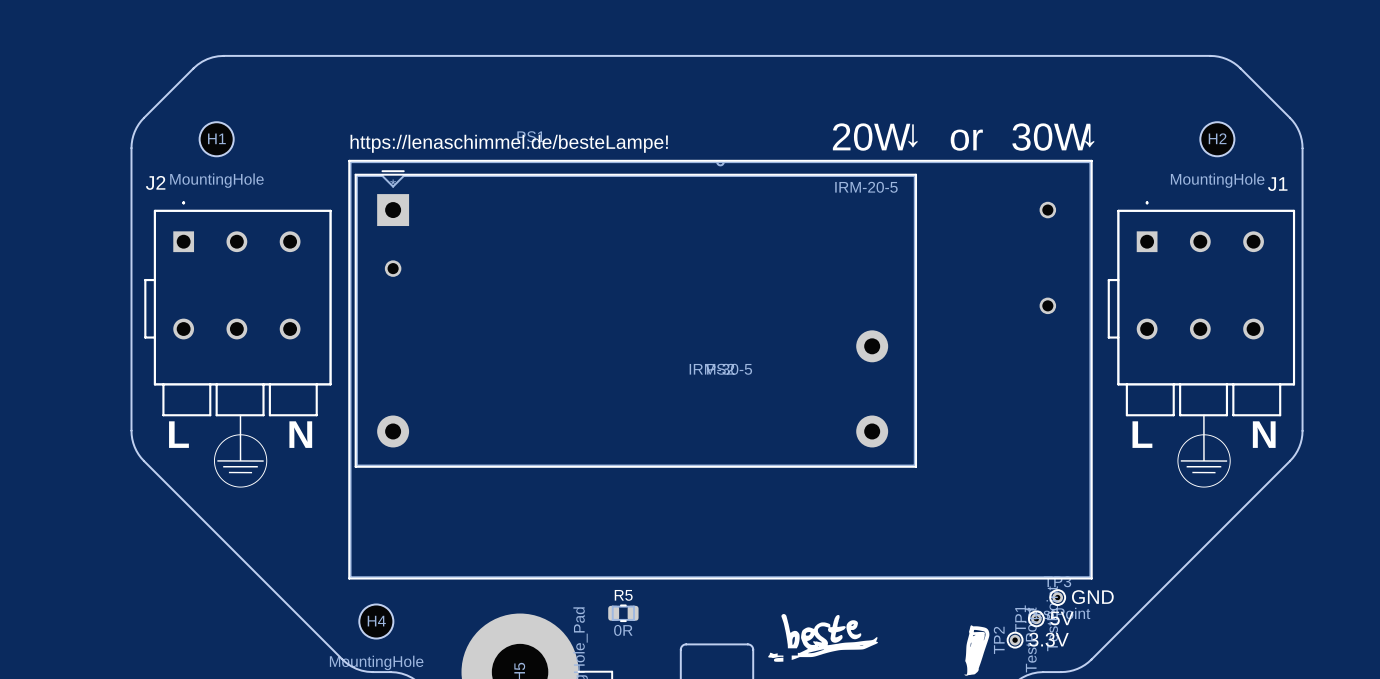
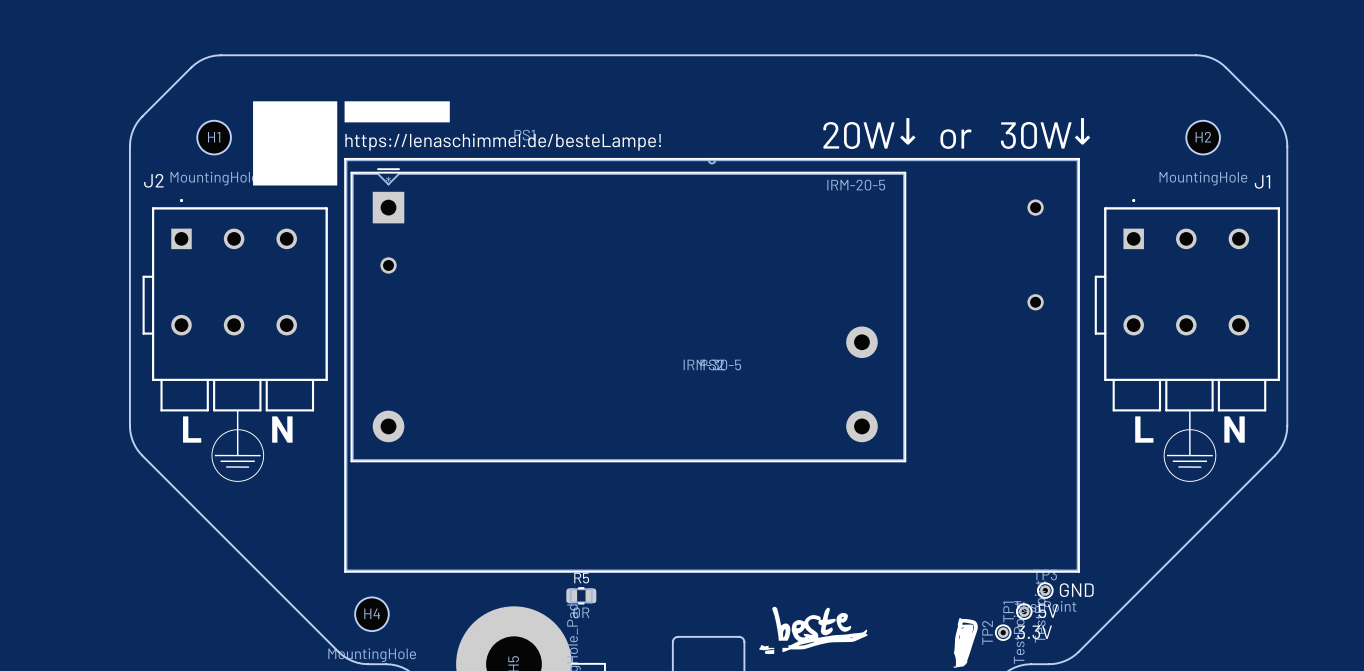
drawing: none -> [253, 101, 450, 186]
R5 position: (623, 613) -> (581, 595)

